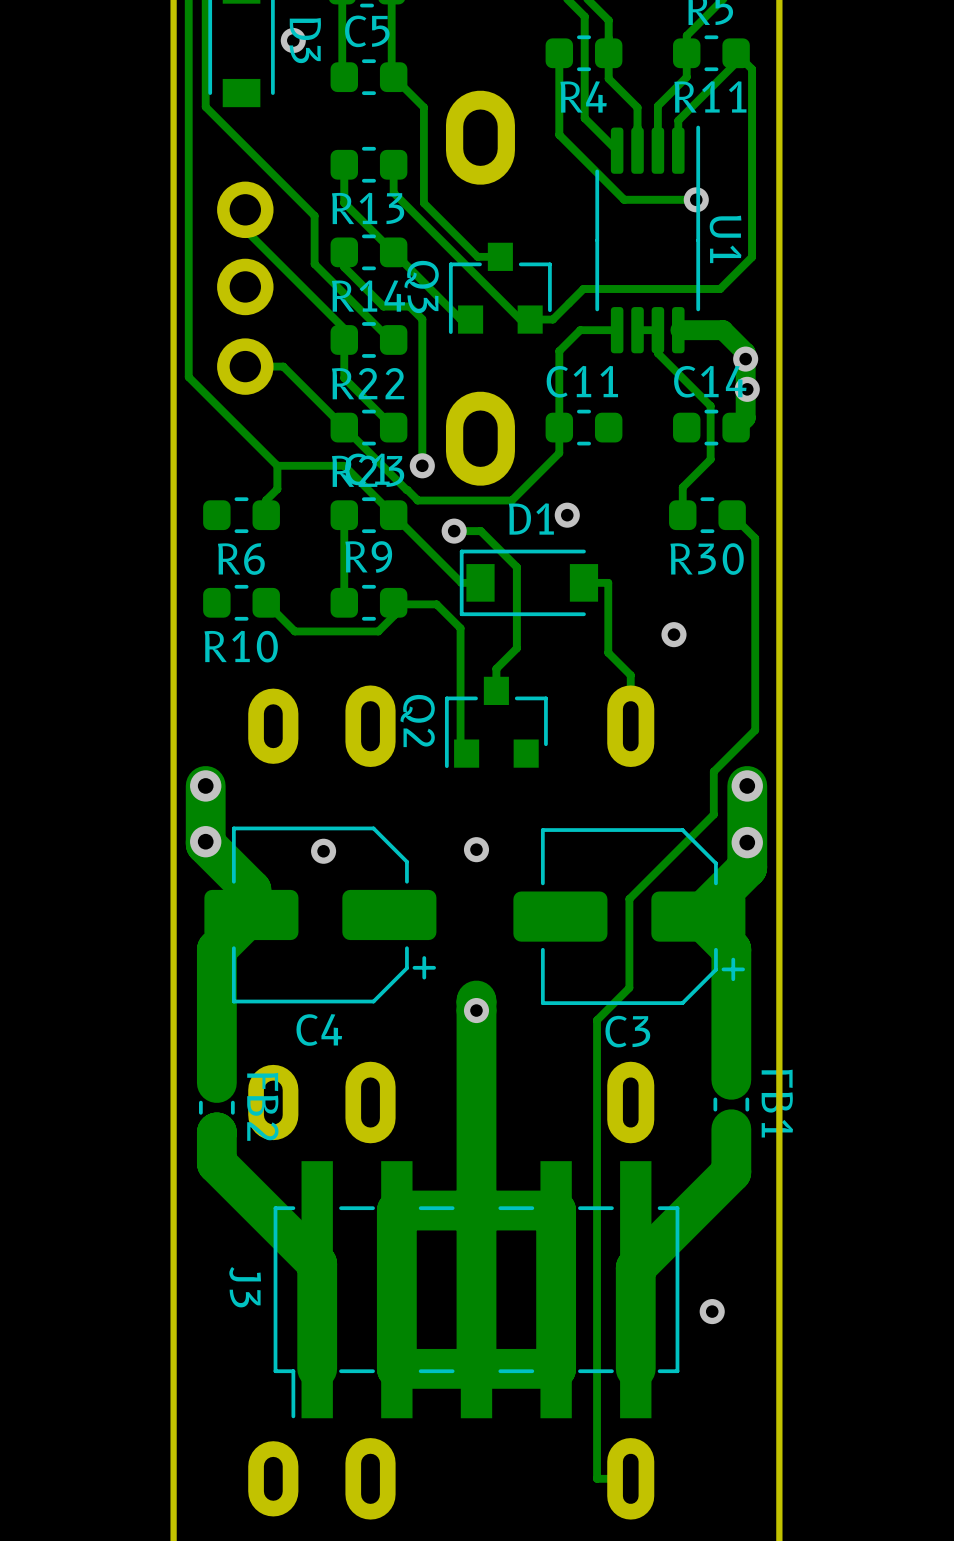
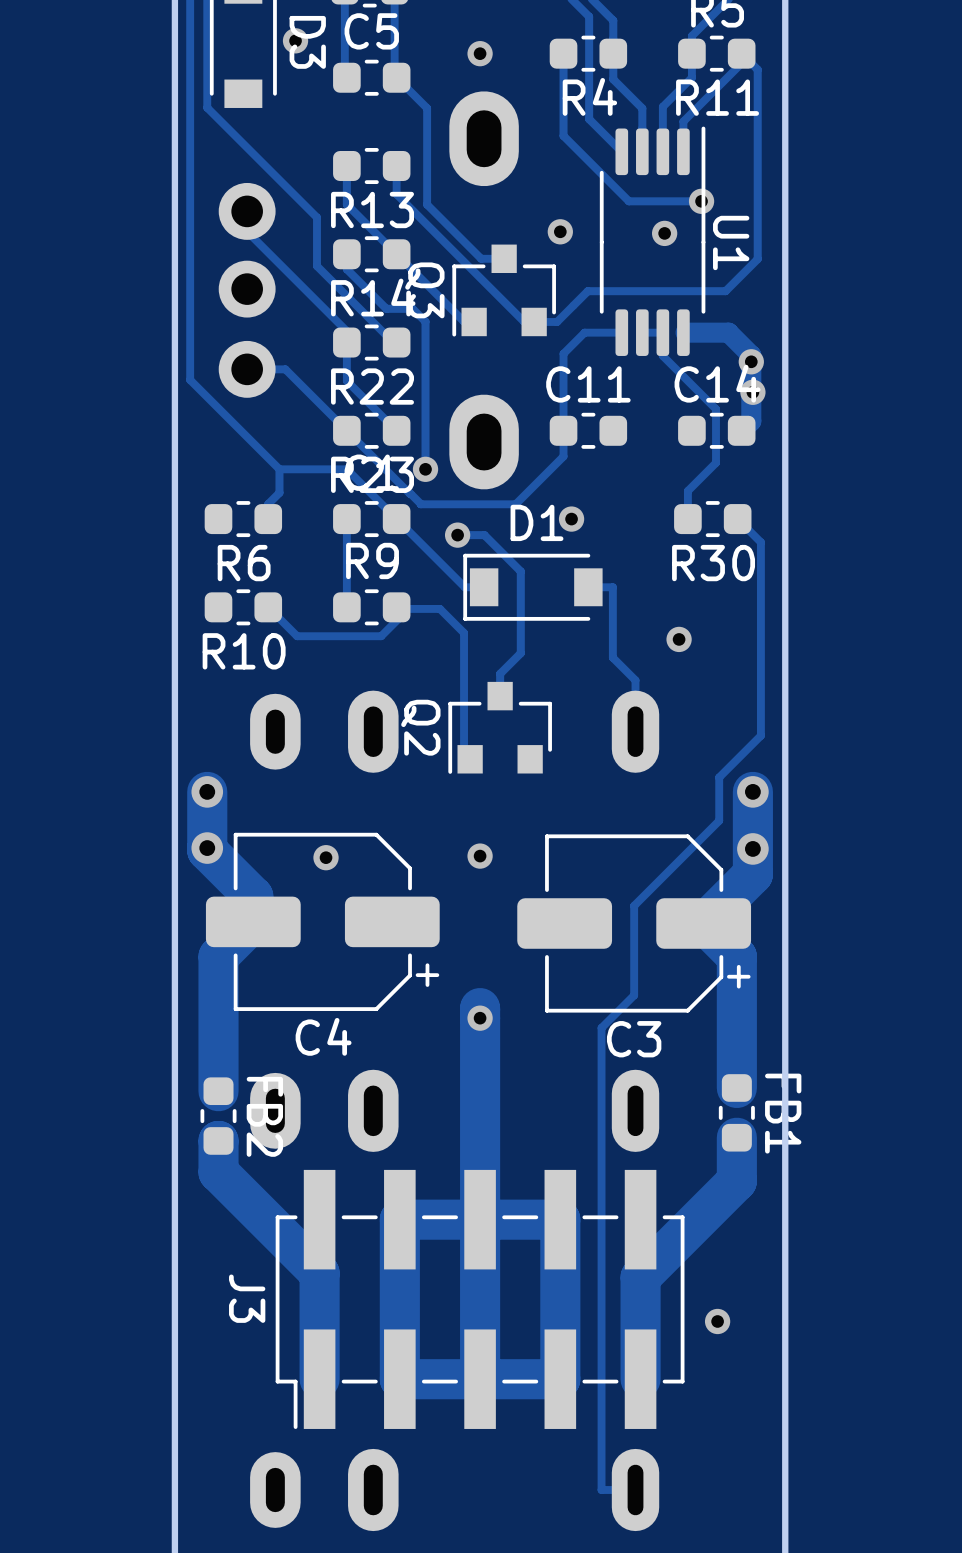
via: none -> (480, 53)
via: none -> (560, 231)
via: none -> (664, 233)

